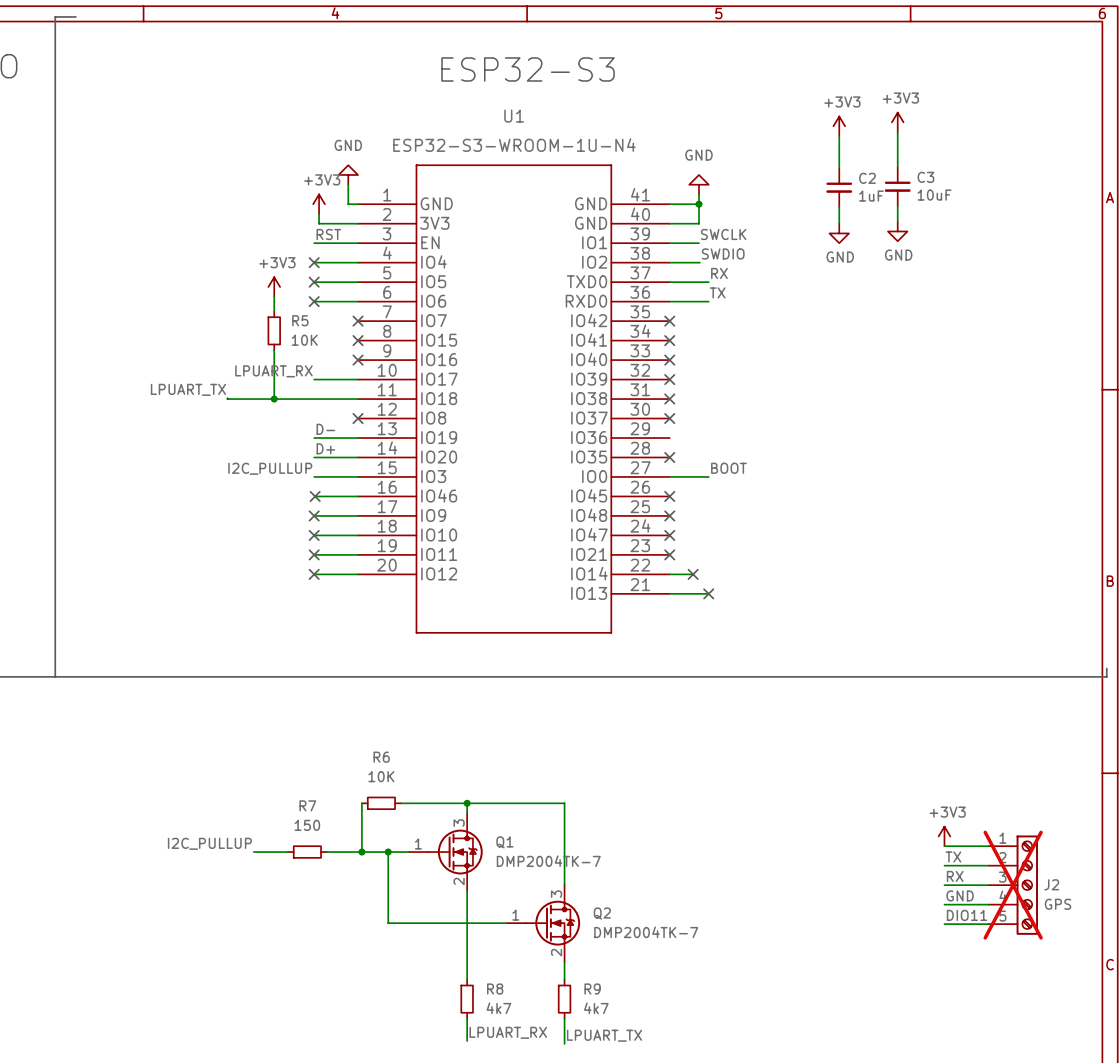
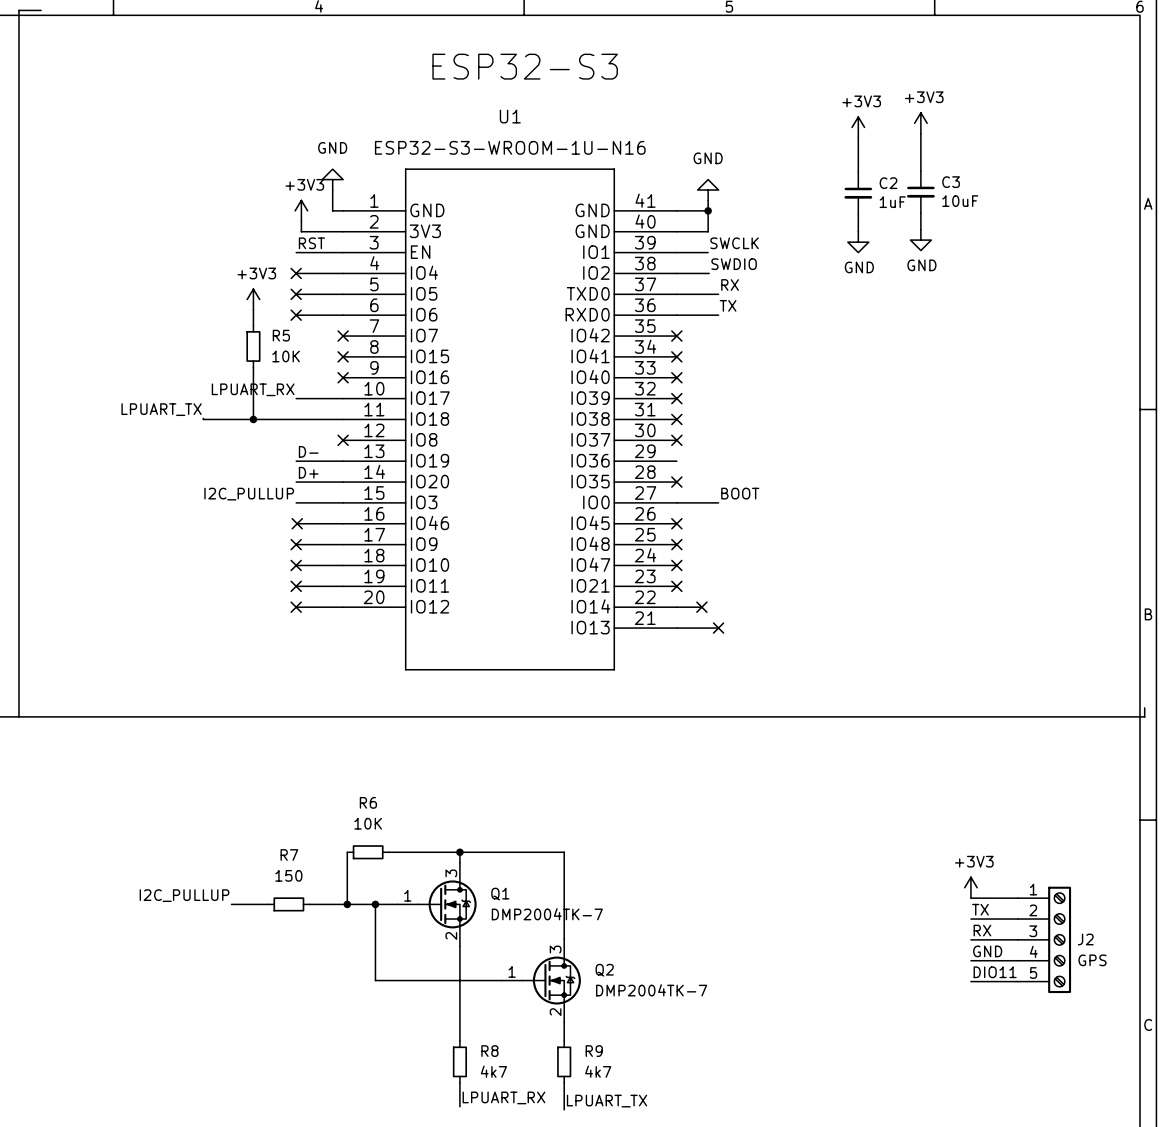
U1 value: ESP32-S3-WROOM-1U-N4 (514, 145) -> ESP32-S3-WROOM-1U-N16 (510, 147)
J2 do-not-place cross: (1013, 885) -> none

